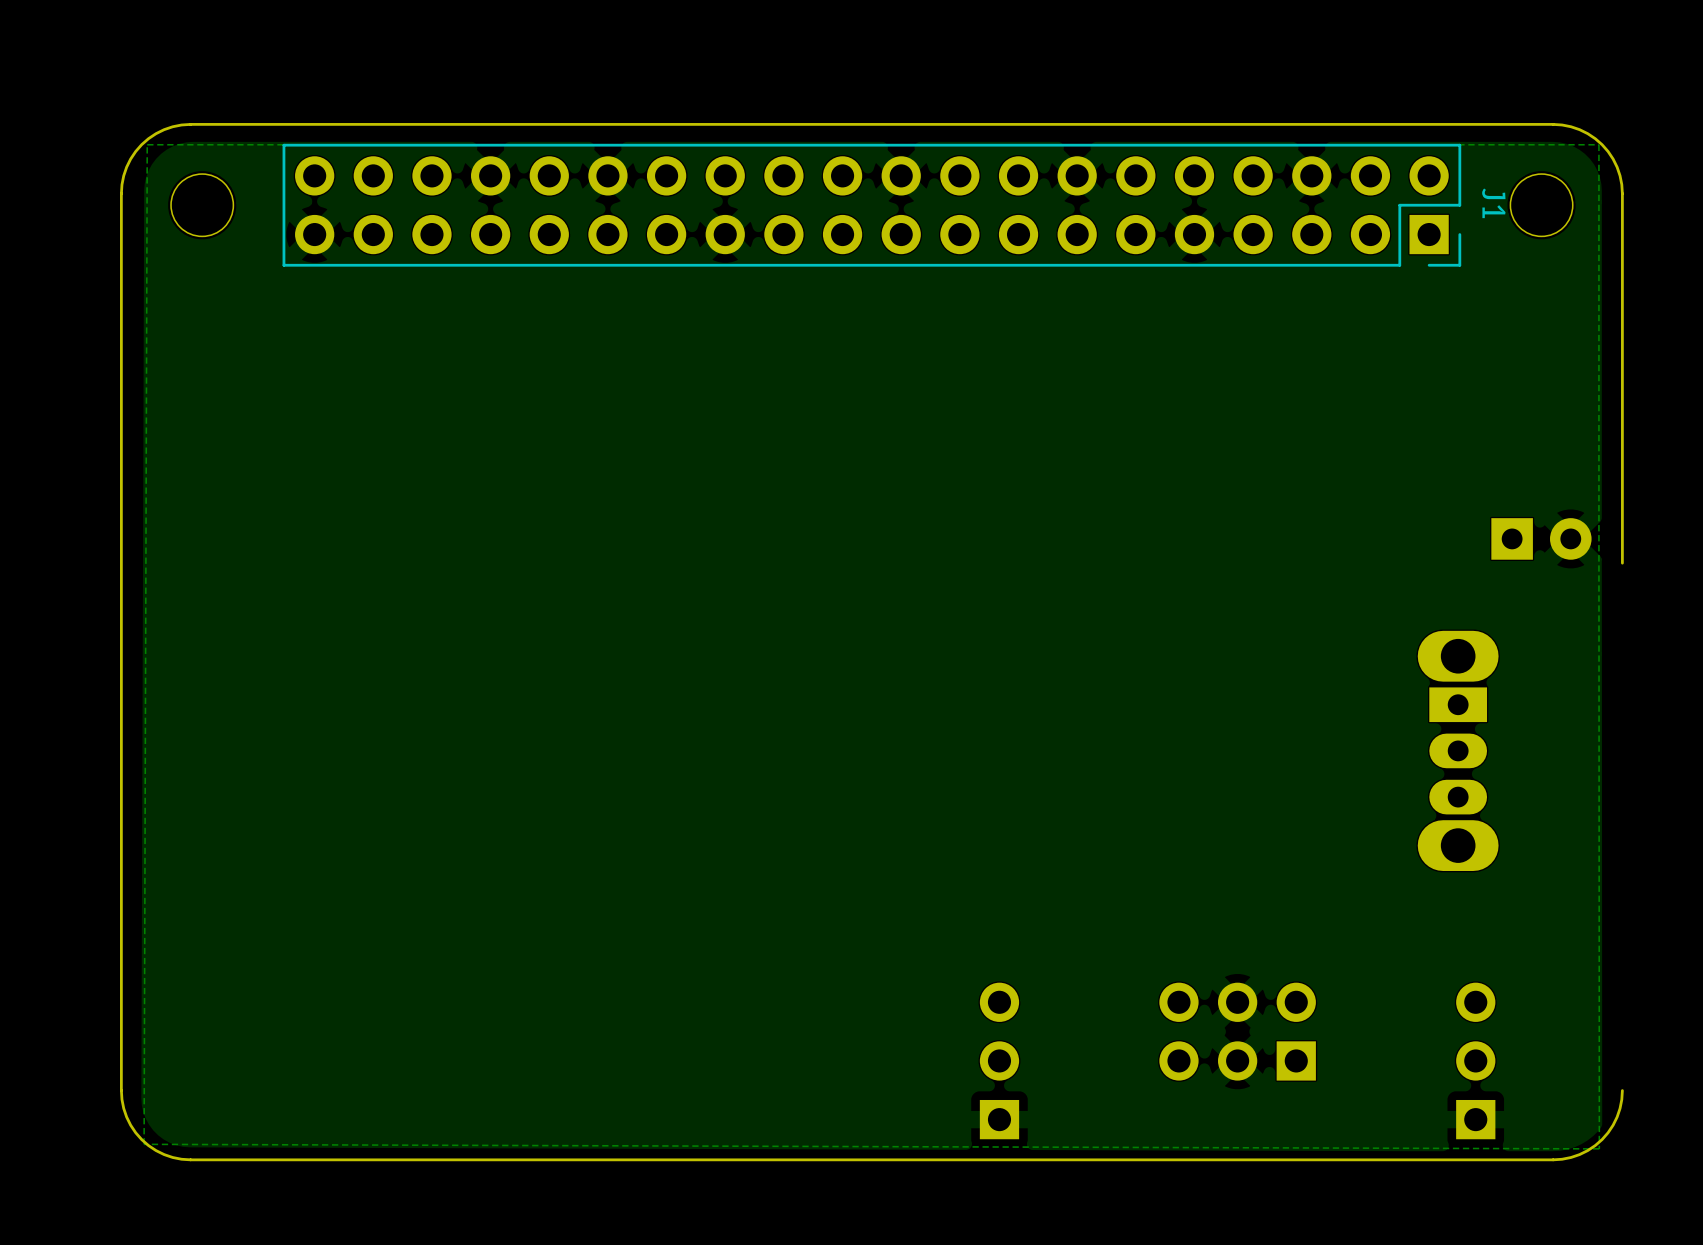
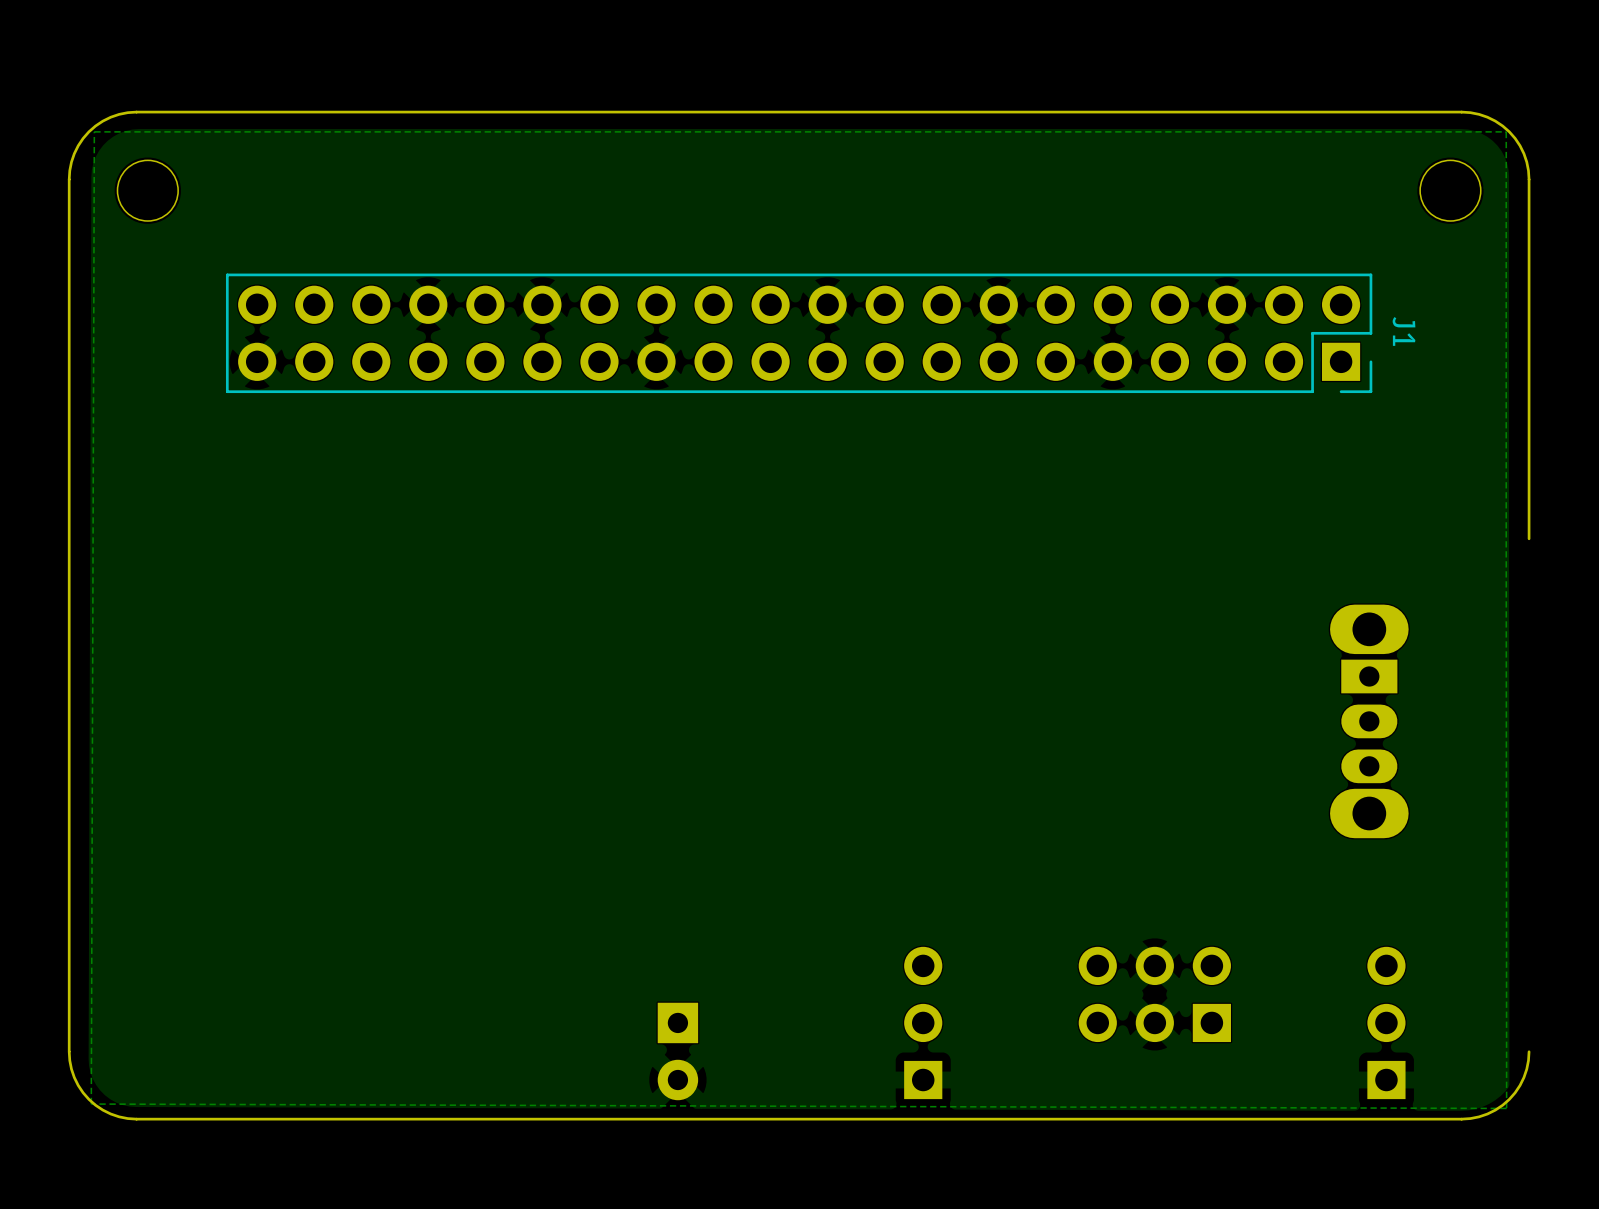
J1 position: (871, 205) -> (799, 333)
part: (1541, 538) -> none
part: none -> (677, 1051)

